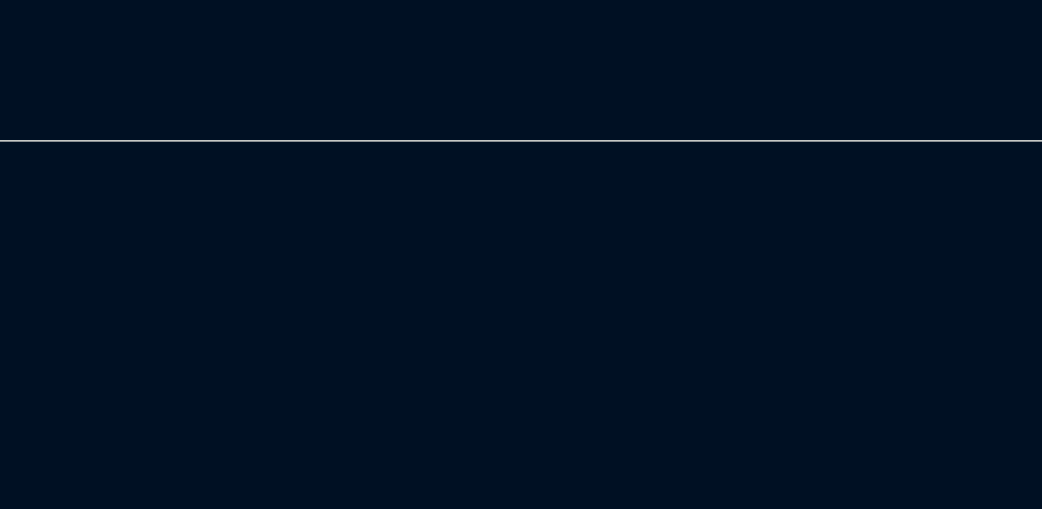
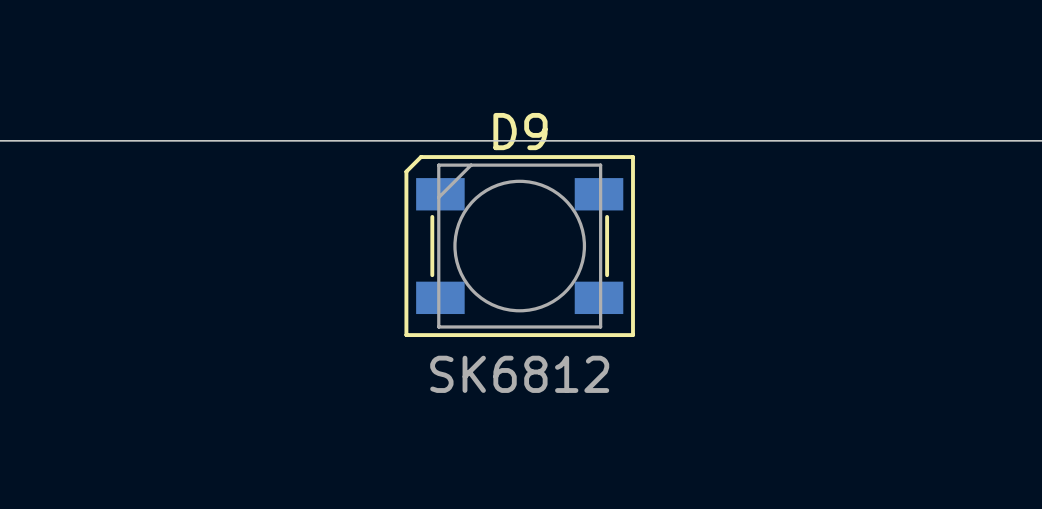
D9: none -> SK6812 (519, 246)

